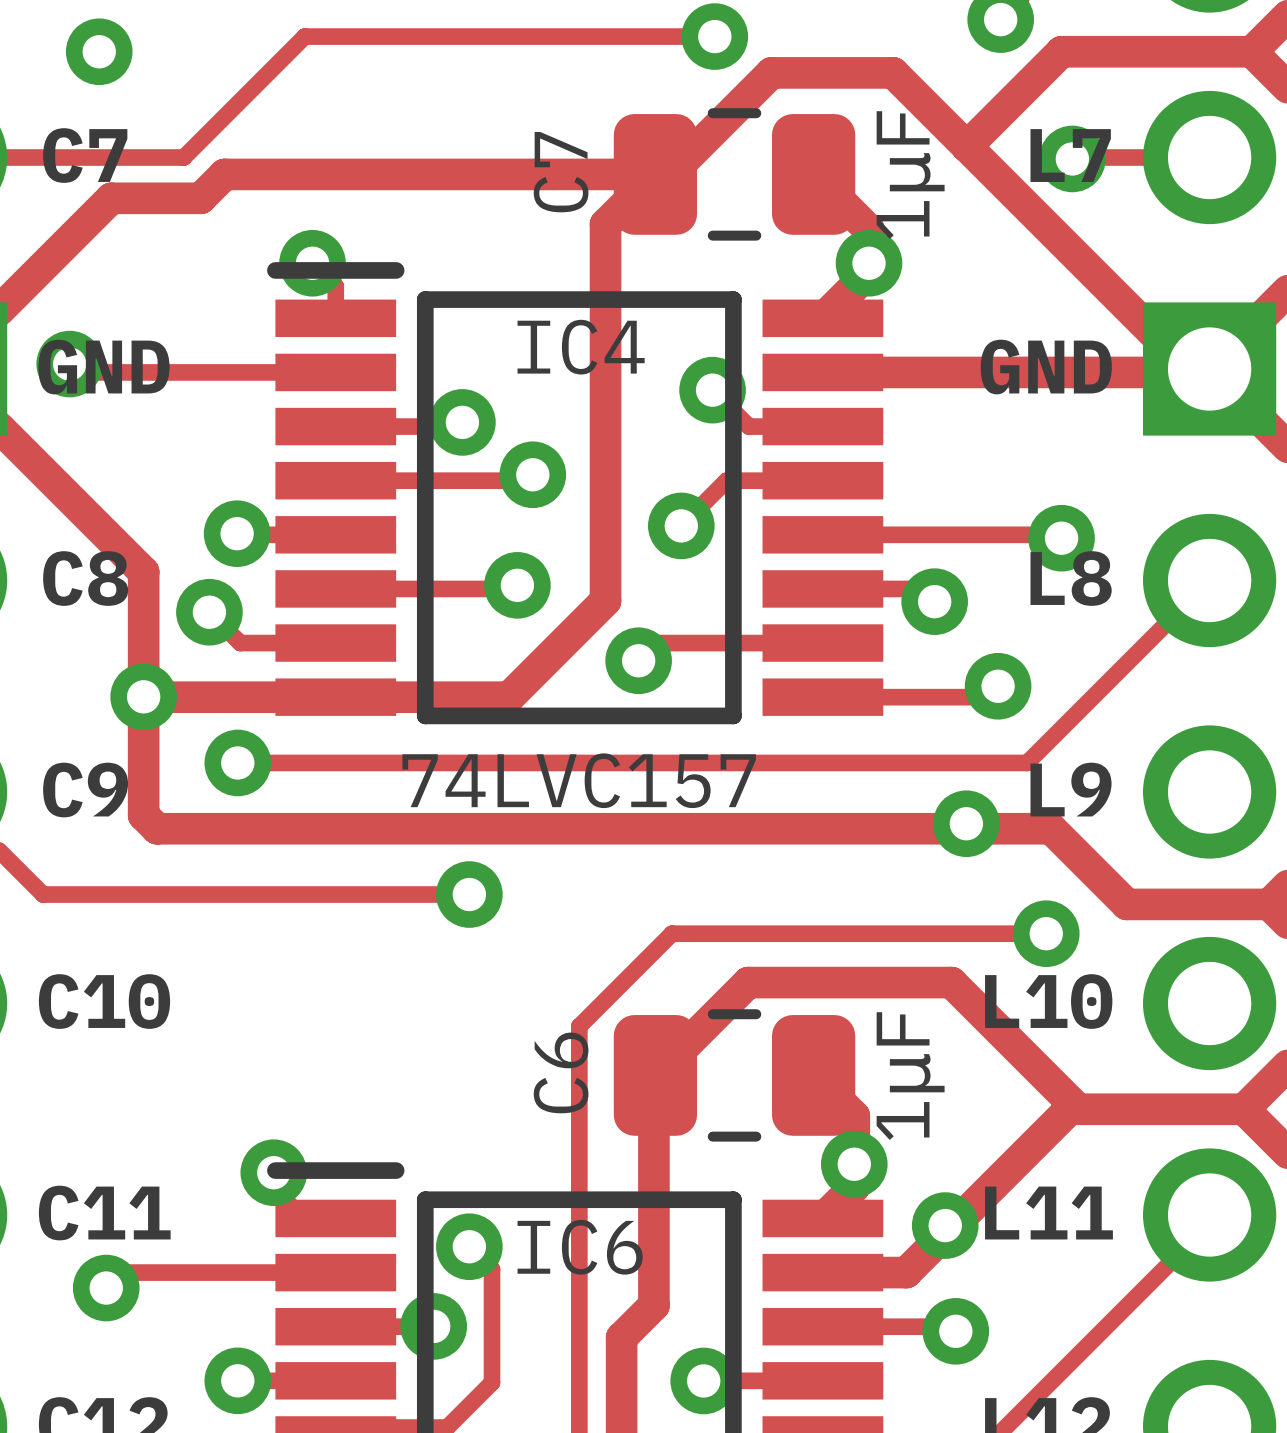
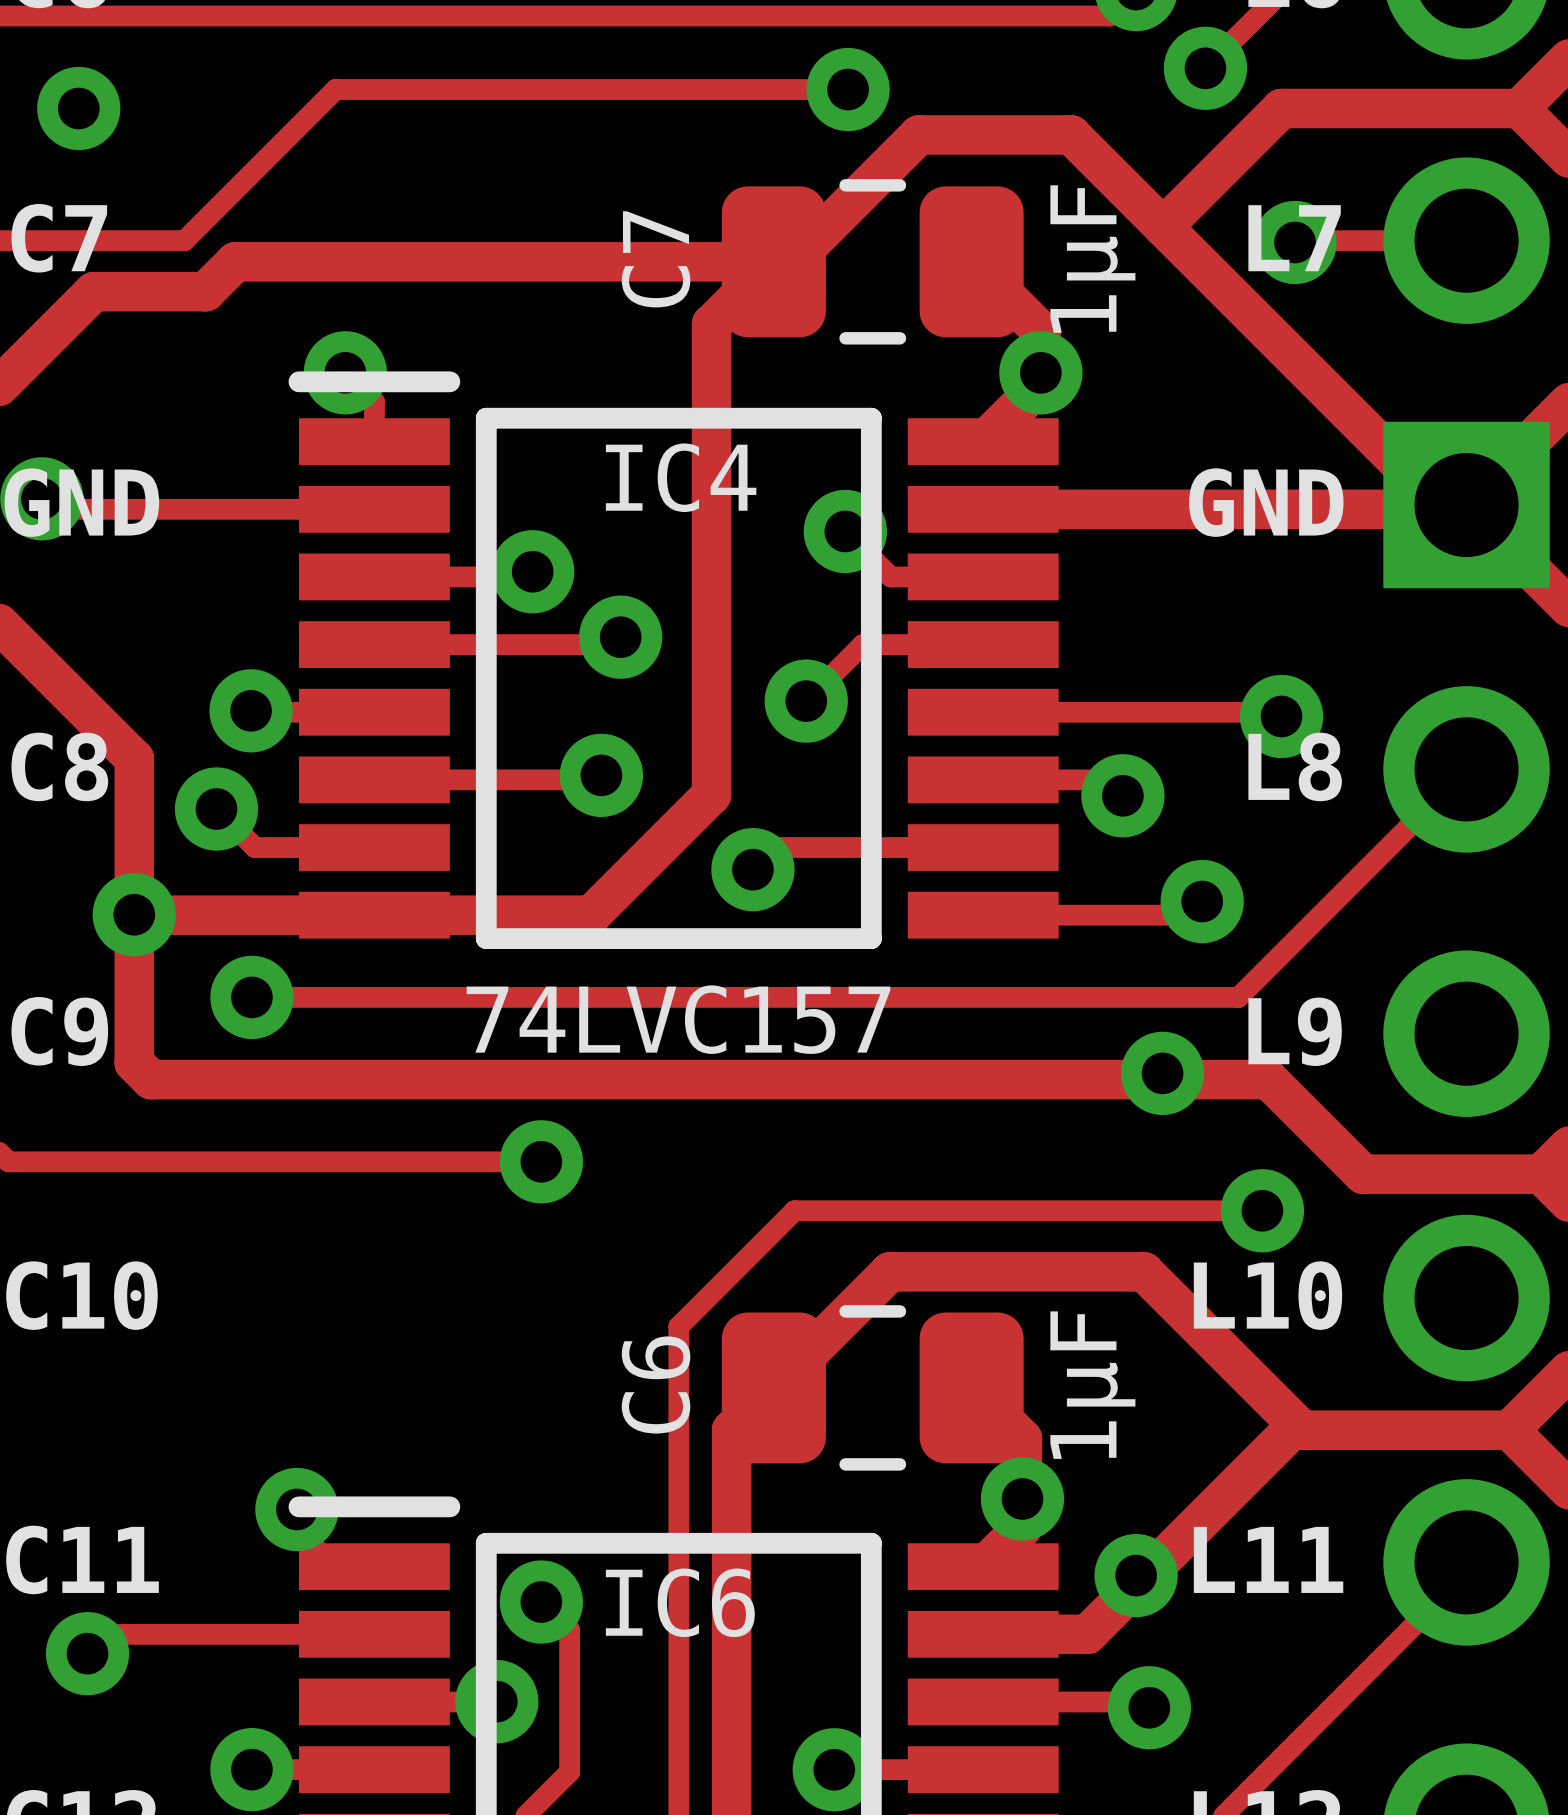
track: (653, 1076) (653, 1305) (621, 1337) -> (772, 1389) (731, 1430) (731, 1715)

